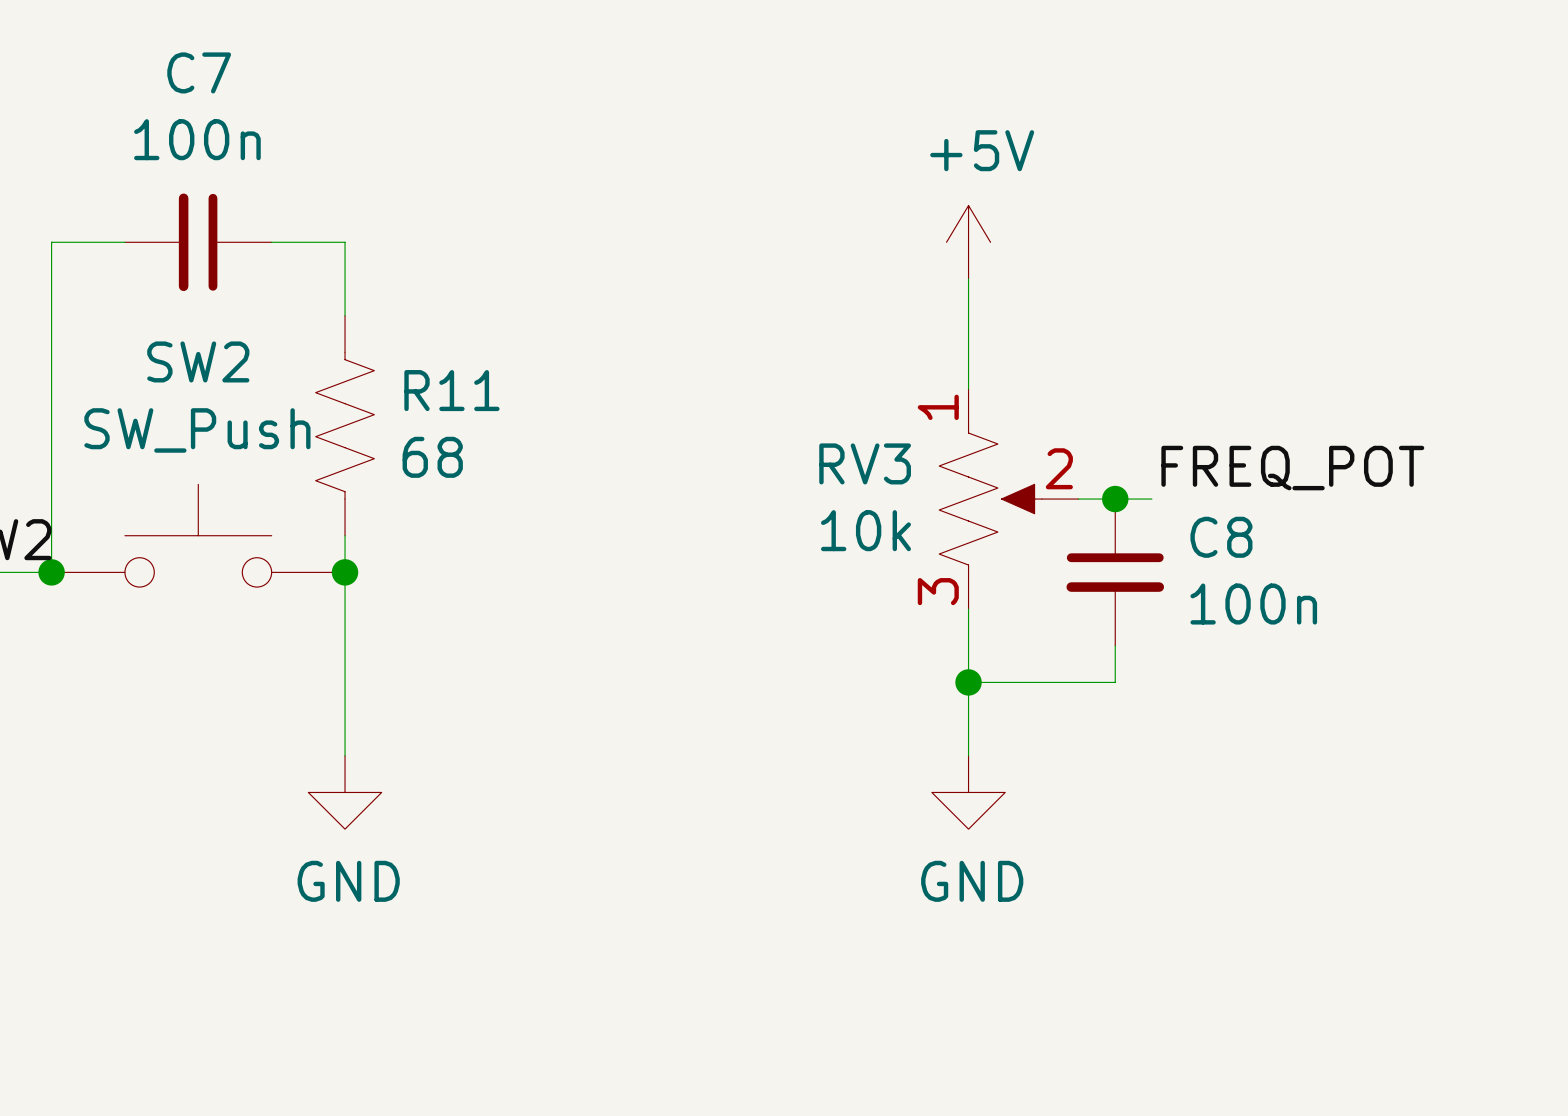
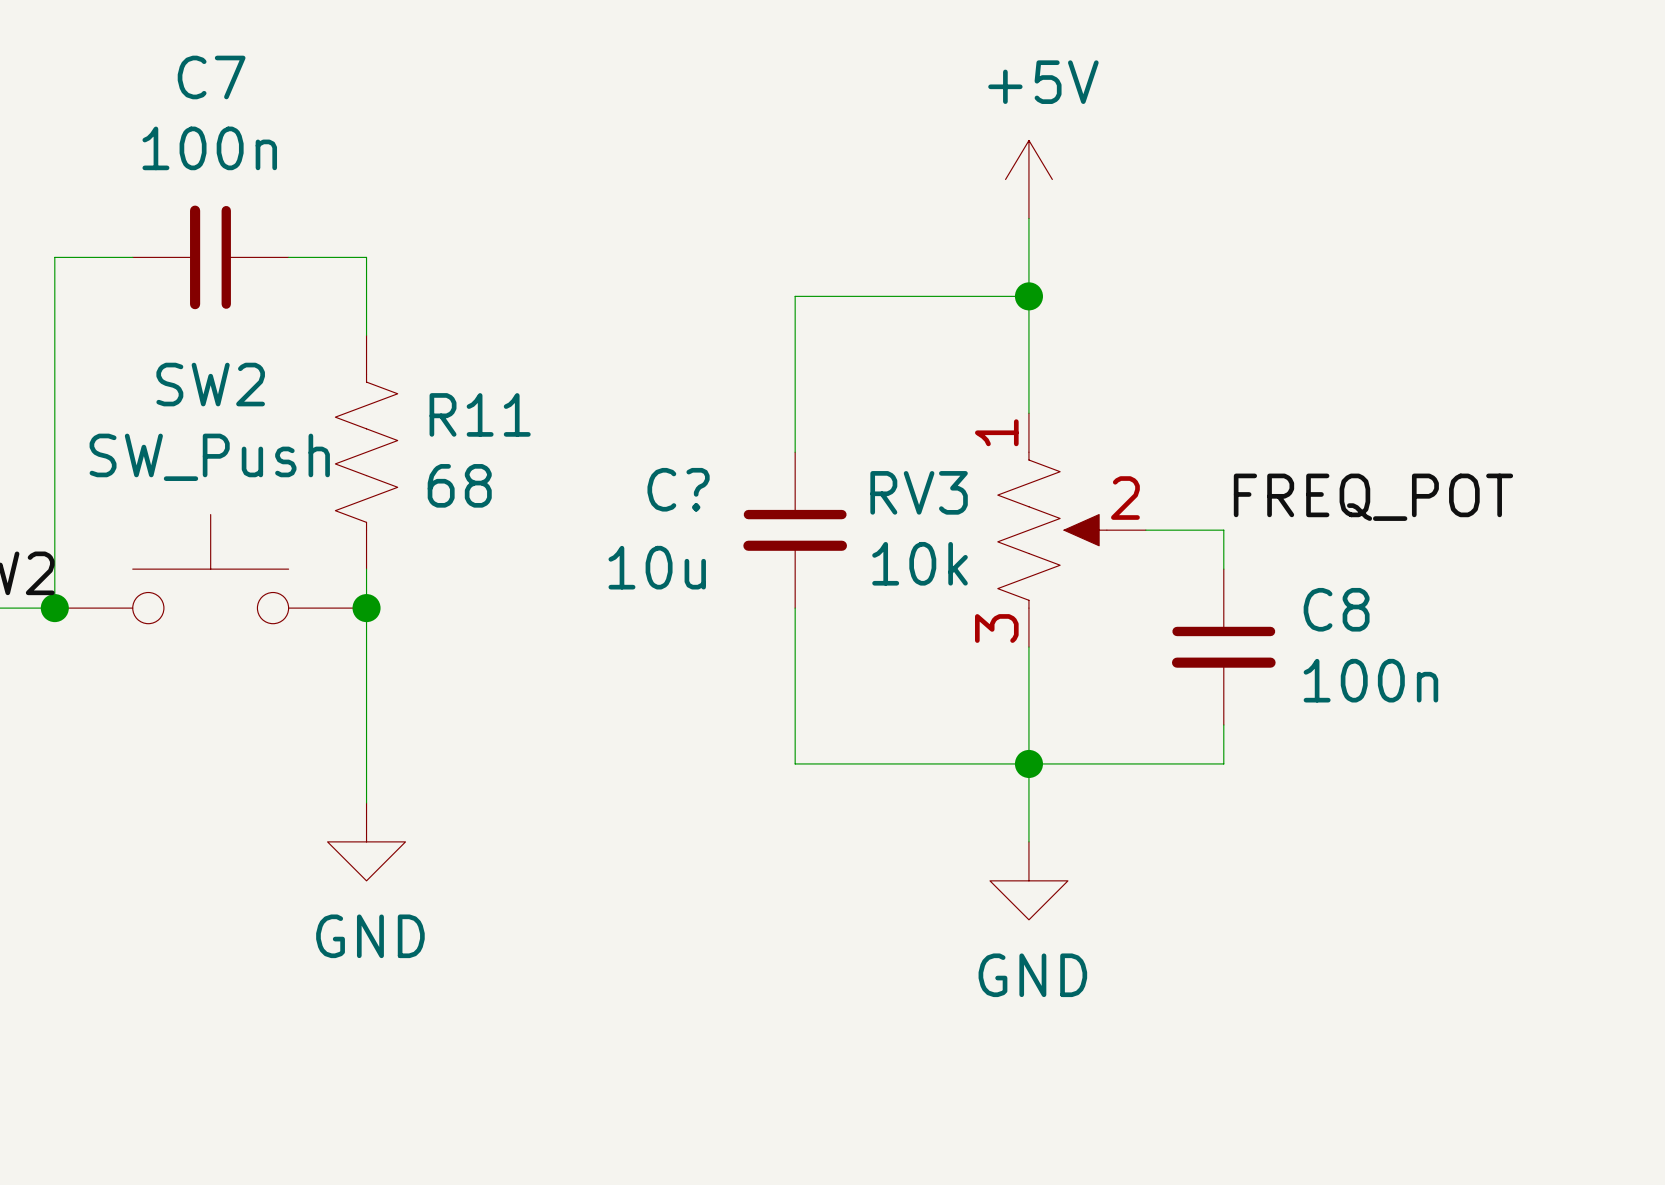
wire: none -> (1028, 218) (1028, 296) (795, 296) (795, 452)
power symbol position: +5V (968, 242) -> +5V (1028, 179)
junction: none -> (1028, 296)
C?: none -> 10u (795, 530)
junction: (1115, 499) -> none
wire: none -> (1223, 530) (1223, 569)
wire: none -> (795, 608) (795, 763) (1223, 763) (1223, 724)
C8 position: (1115, 572) -> (1223, 647)
wire: (1115, 645) (1115, 682) (968, 682) -> none
junction position: (968, 682) -> (1028, 763)
power symbol position: GND (968, 792) -> GND (1028, 880)

